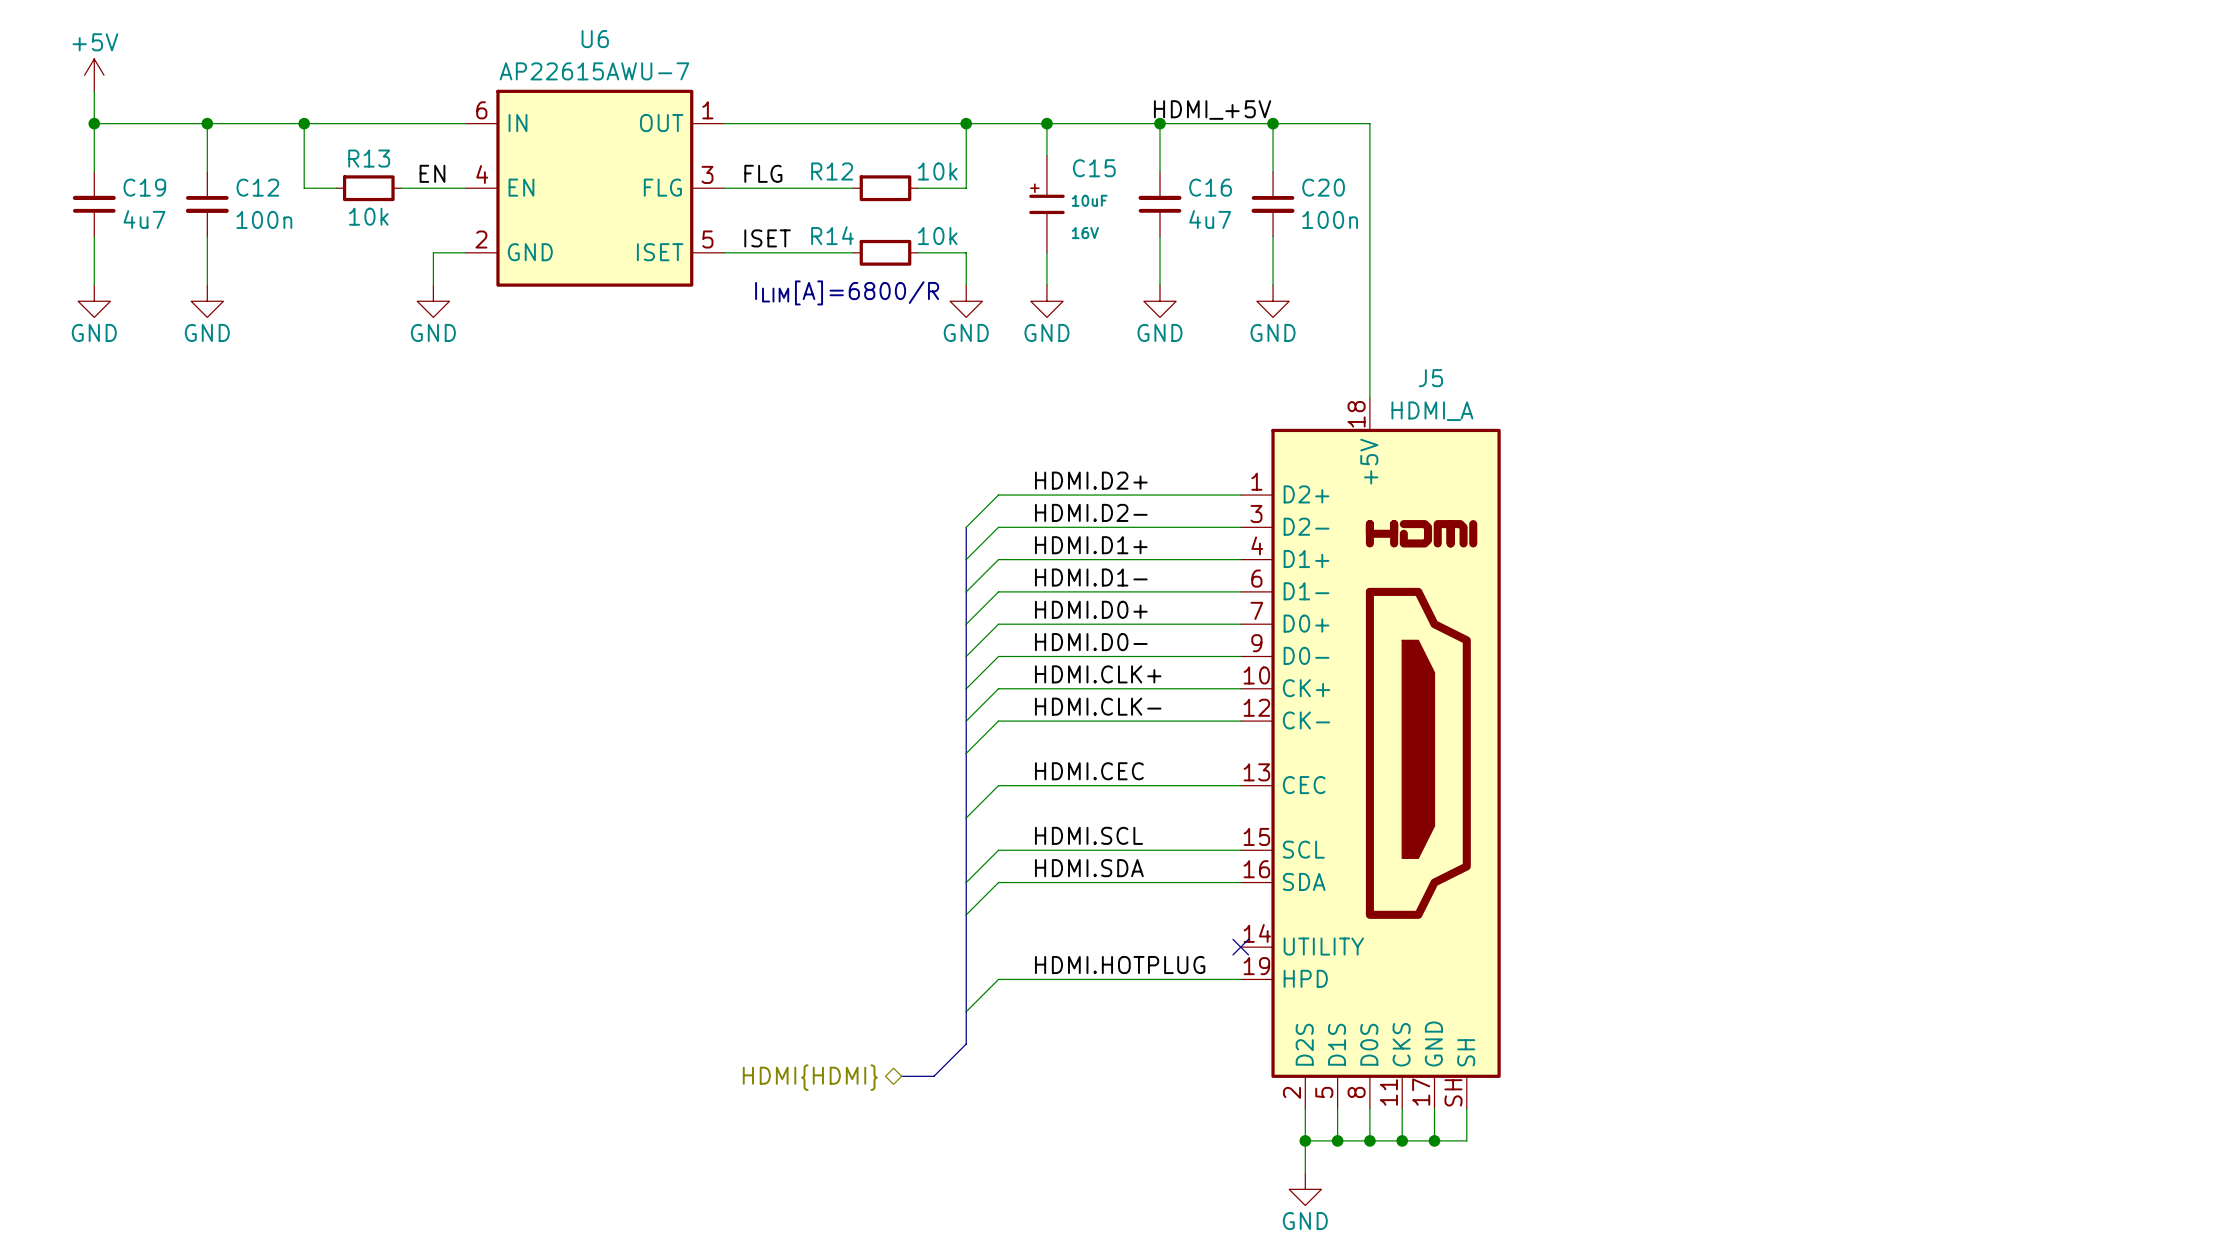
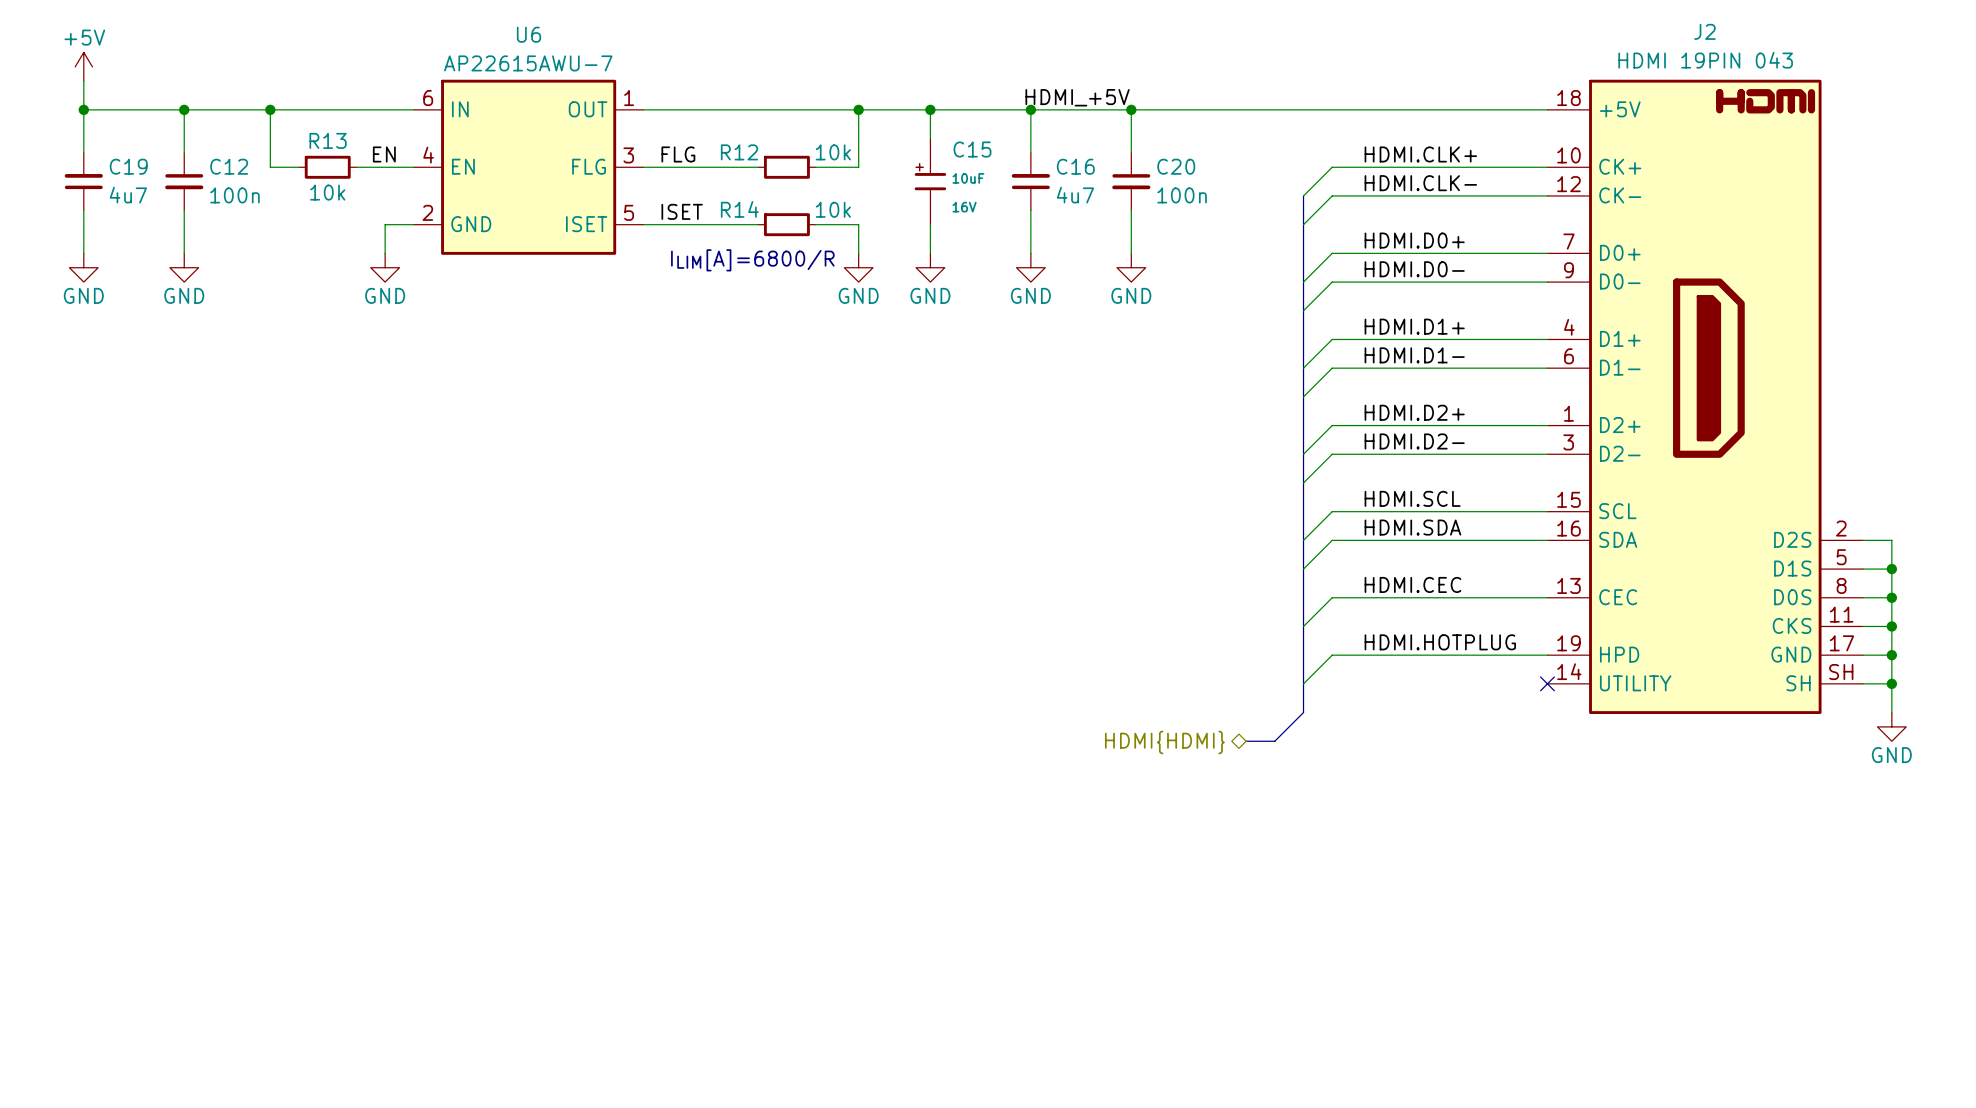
wire: (1369, 123) (1369, 398) -> (1217, 109) (1547, 109)
label: none -> HDMI.CLK+ (1420, 154)
wire: none -> (1547, 167) (1332, 167) (1303, 195)
label: none -> HDMI.CLK- (1420, 183)
bus: none -> (1303, 195) (1303, 712) (1274, 741) (1246, 741)
wire: none -> (1547, 195) (1332, 195) (1303, 224)
label: none -> HDMI.D0+ (1414, 240)
wire: none -> (1547, 253) (1332, 253) (1303, 282)
label: none -> HDMI.D0- (1414, 269)
wire: none -> (1547, 282) (1332, 282) (1303, 310)
label: none -> HDMI.D1+ (1414, 326)
wire: none -> (1547, 339) (1332, 339) (1303, 368)
label: none -> HDMI.D1- (1414, 355)
wire: none -> (1547, 368) (1332, 368) (1303, 396)
J2: none -> (1705, 396)
label: none -> HDMI.D2+ (1414, 412)
wire: none -> (1547, 425) (1332, 425) (1303, 454)
label: HDMI.D2+ (1091, 480) -> none
wire: (1240, 495) (998, 495) (966, 527) -> none
label: none -> HDMI.D2- (1414, 441)
wire: none -> (1547, 454) (1332, 454) (1303, 482)
label: HDMI.D2- (1091, 512) -> none
bus: (966, 527) (966, 1044) (933, 1076) (901, 1076) -> none
wire: (1240, 527) (998, 527) (966, 559) -> none
label: HDMI.D1+ (1091, 545) -> none
wire: (1240, 559) (998, 559) (966, 591) -> none
label: none -> HDMI.SCL (1412, 498)
wire: none -> (1547, 511) (1332, 511) (1303, 540)
label: HDMI.D1- (1091, 577) -> none
wire: (1240, 591) (998, 591) (966, 624) -> none
label: none -> HDMI.SDA (1412, 527)
wire: none -> (1547, 540) (1332, 540) (1303, 569)
wire: none -> (1863, 540) (1891, 540) (1891, 712)
label: HDMI.D0+ (1091, 609) -> none
wire: (1240, 624) (998, 624) (966, 656) -> none
wire: none -> (1863, 569) (1891, 569)
junction: none -> (1891, 569)
label: HDMI.D0- (1091, 642) -> none
wire: (1240, 656) (998, 656) (966, 688) -> none
label: none -> HDMI.CEC (1412, 584)
wire: none -> (1547, 597) (1332, 597) (1303, 626)
wire: none -> (1863, 597) (1891, 597)
junction: none -> (1891, 597)
label: HDMI.CLK+ (1098, 674) -> none
wire: (1240, 688) (998, 688) (966, 721) -> none
wire: none -> (1863, 626) (1891, 626)
junction: none -> (1891, 626)
label: HDMI.CLK- (1098, 706) -> none
wire: (1240, 721) (998, 721) (966, 753) -> none
label: none -> HDMI.HOTPLUG (1440, 642)
wire: none -> (1547, 655) (1332, 655) (1303, 683)
wire: none -> (1863, 655) (1891, 655)
junction: none -> (1891, 655)
J5: HDMI_A (1370, 753) -> none
no-connect mark: none -> (1547, 683)
wire: none -> (1863, 683) (1891, 683)
junction: none -> (1891, 683)
label: HDMI.CEC (1089, 771) -> none
wire: (1240, 785) (998, 785) (966, 817) -> none
power symbol: none -> GND (1891, 726)
label: HDMI.SCL (1088, 835) -> none
hierarchical label: none -> HDMI{HDMI} (1164, 742)
wire: (1240, 850) (998, 850) (966, 882) -> none
label: HDMI.SDA (1089, 868) -> none
wire: (1240, 882) (998, 882) (966, 914) -> none
no-connect mark: (1240, 947) -> none
label: HDMI.HOTPLUG (1120, 965) -> none
wire: (1240, 979) (998, 979) (966, 1011) -> none
hierarchical label: HDMI{HDMI} (810, 1077) -> none
wire: (1305, 1108) (1305, 1173) -> none
wire: (1337, 1108) (1337, 1140) -> none
wire: (1369, 1108) (1369, 1140) -> none
wire: (1402, 1108) (1402, 1140) -> none
wire: (1434, 1108) (1434, 1140) -> none
wire: (1466, 1108) (1466, 1140) (1305, 1140) -> none
junction: (1305, 1140) -> none
junction: (1337, 1140) -> none
junction: (1369, 1140) -> none
junction: (1402, 1140) -> none
junction: (1434, 1140) -> none
power symbol: GND (1305, 1189) -> none

